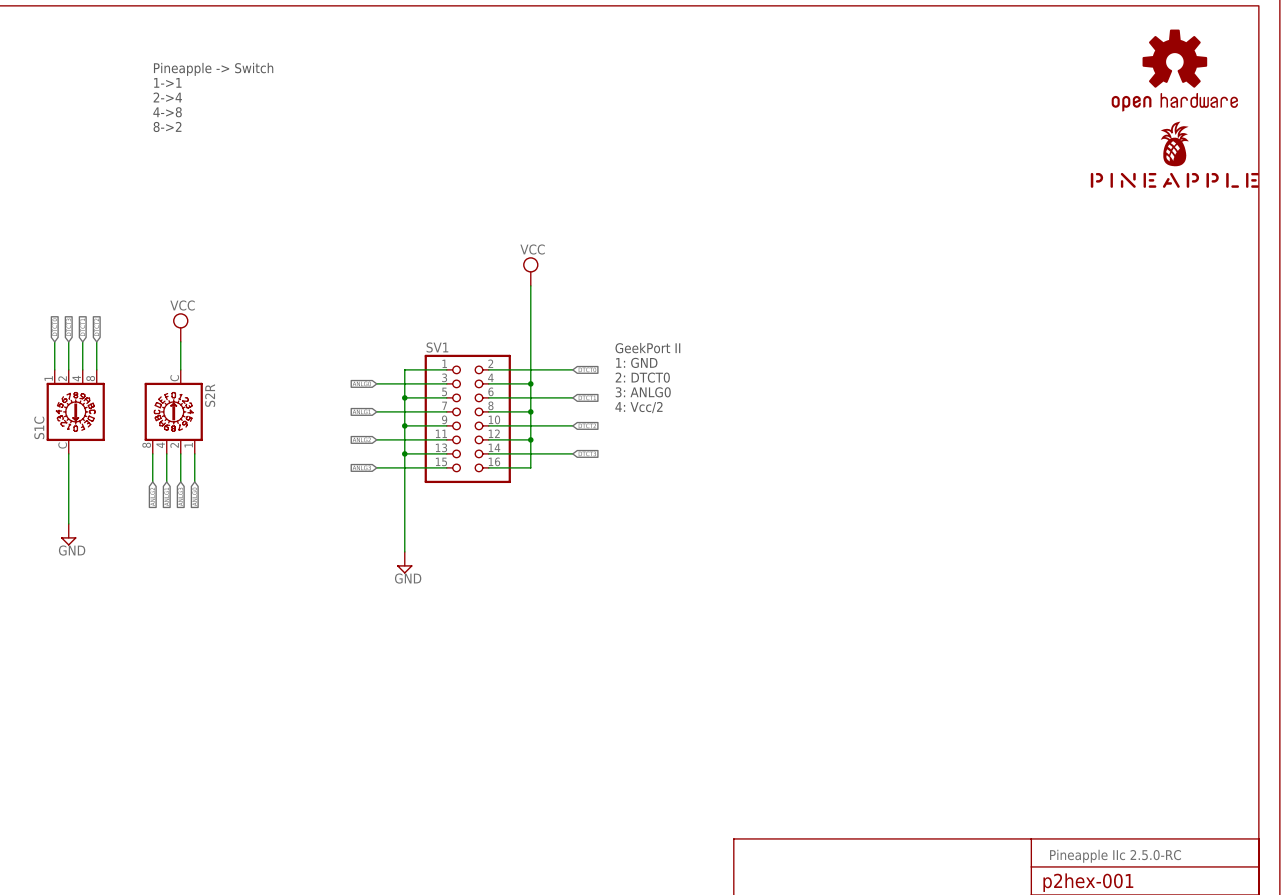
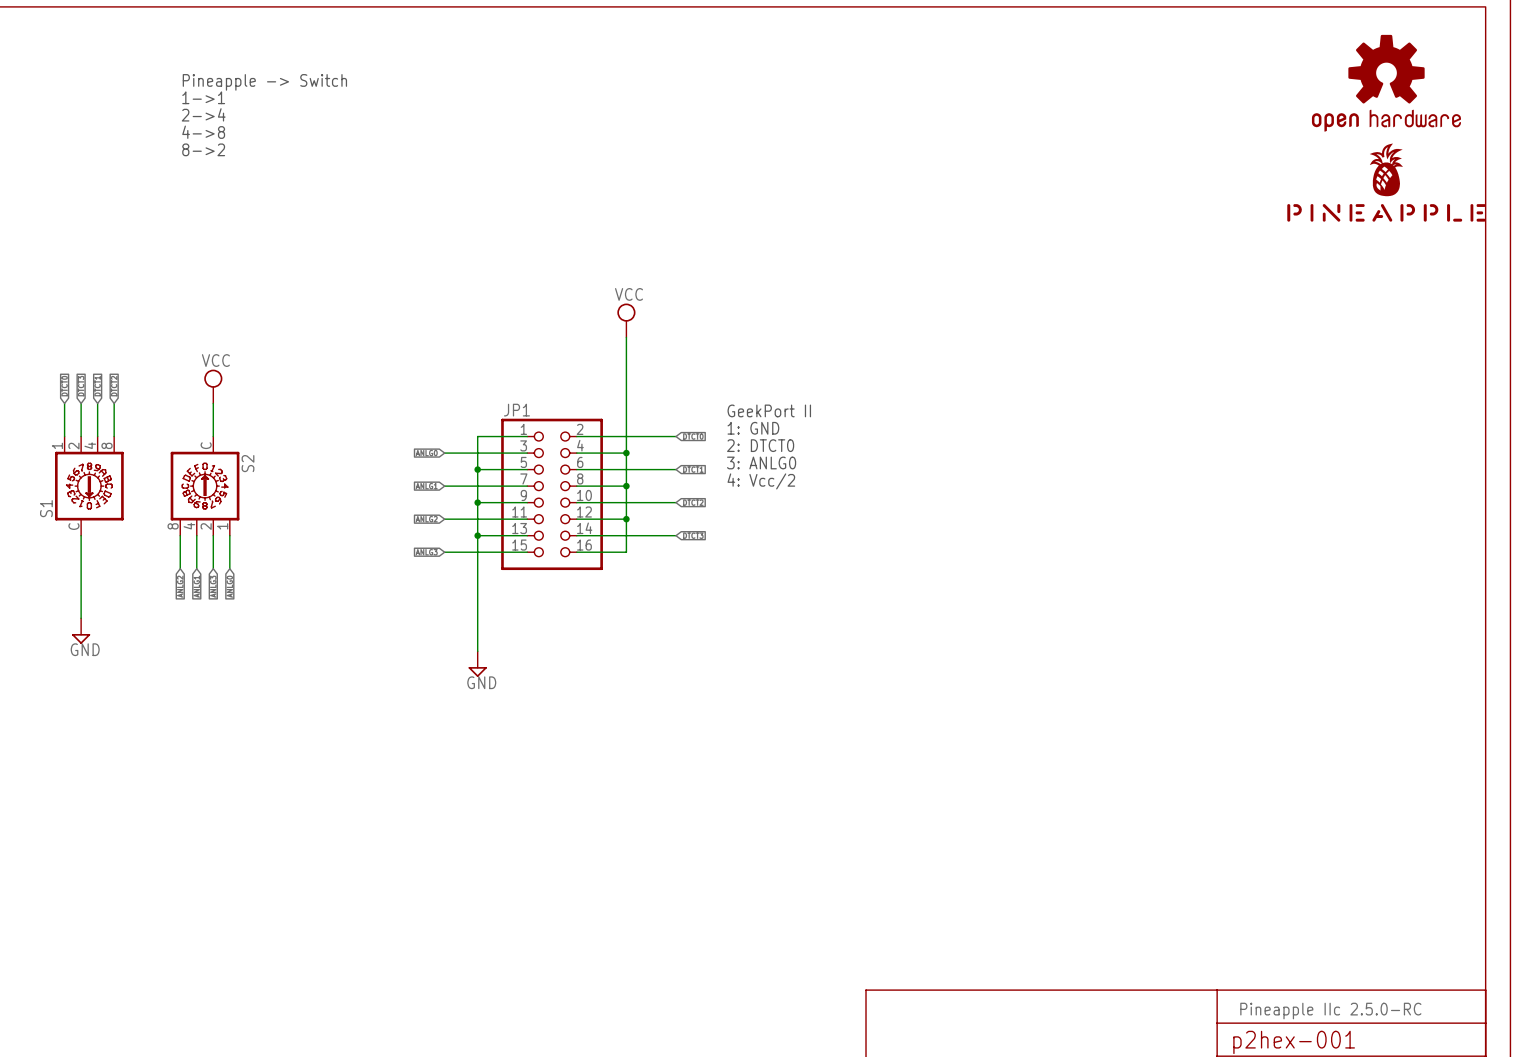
SV1 name: SV1 (437, 347) -> JP1 (516, 410)
S2R name: S2R (210, 395) -> S2 (248, 463)
S1C name: S1C (39, 427) -> S1 (46, 508)

